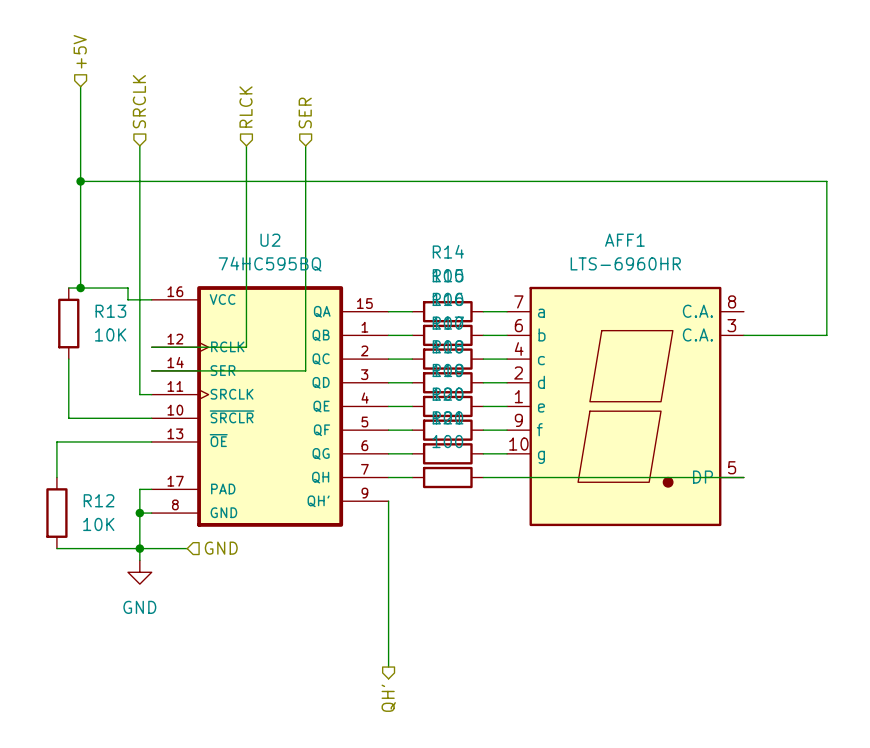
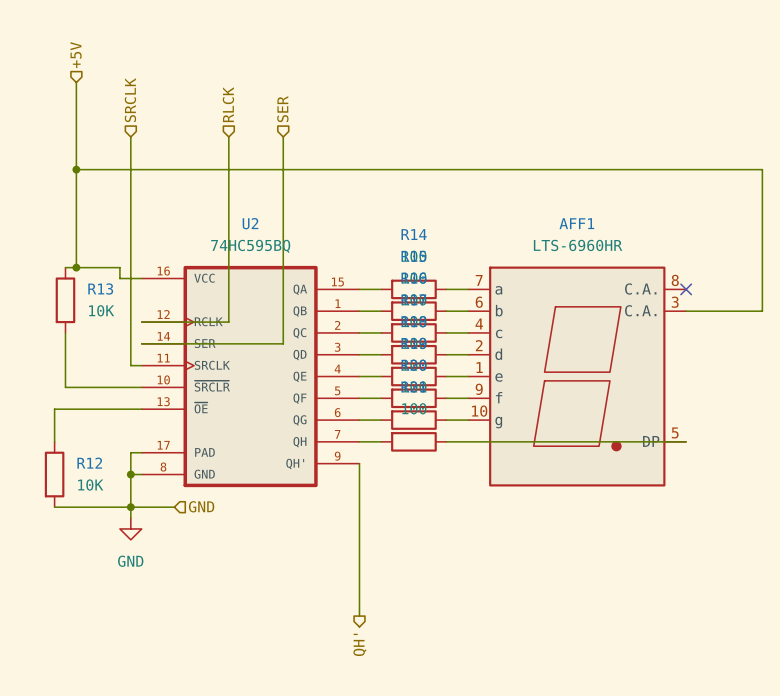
no-connect mark: none -> (686, 289)

